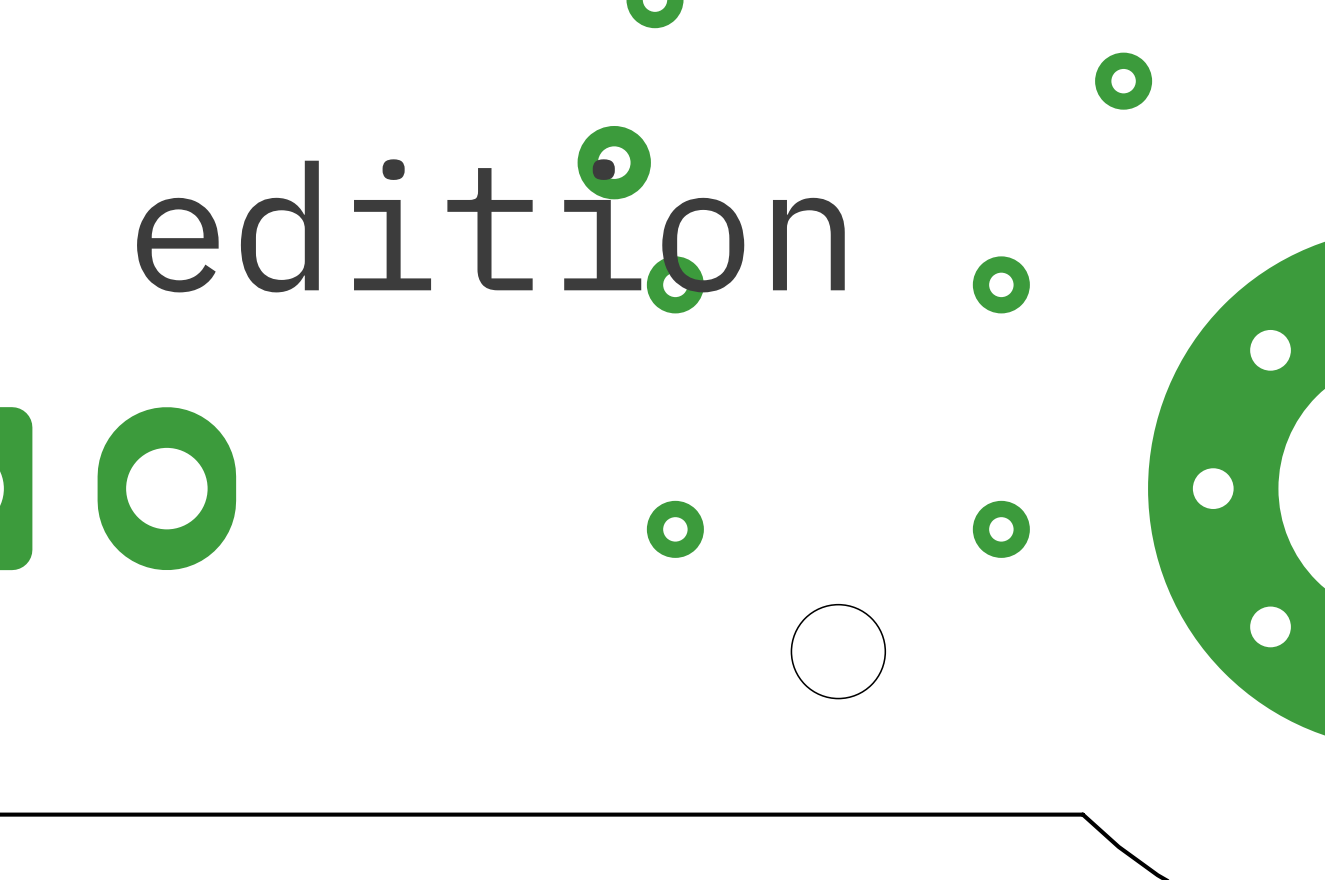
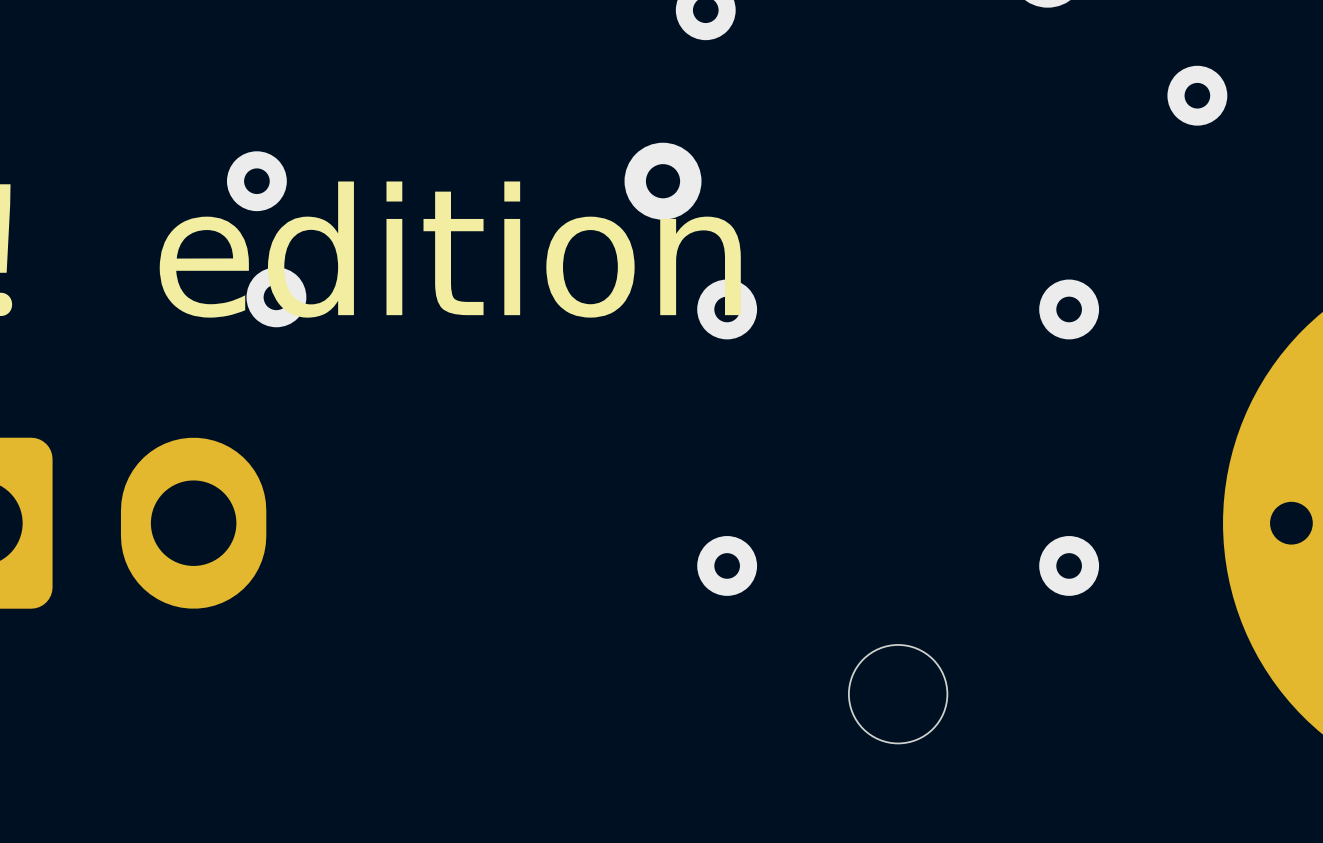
via: none -> (256, 181)
via: none -> (276, 297)

